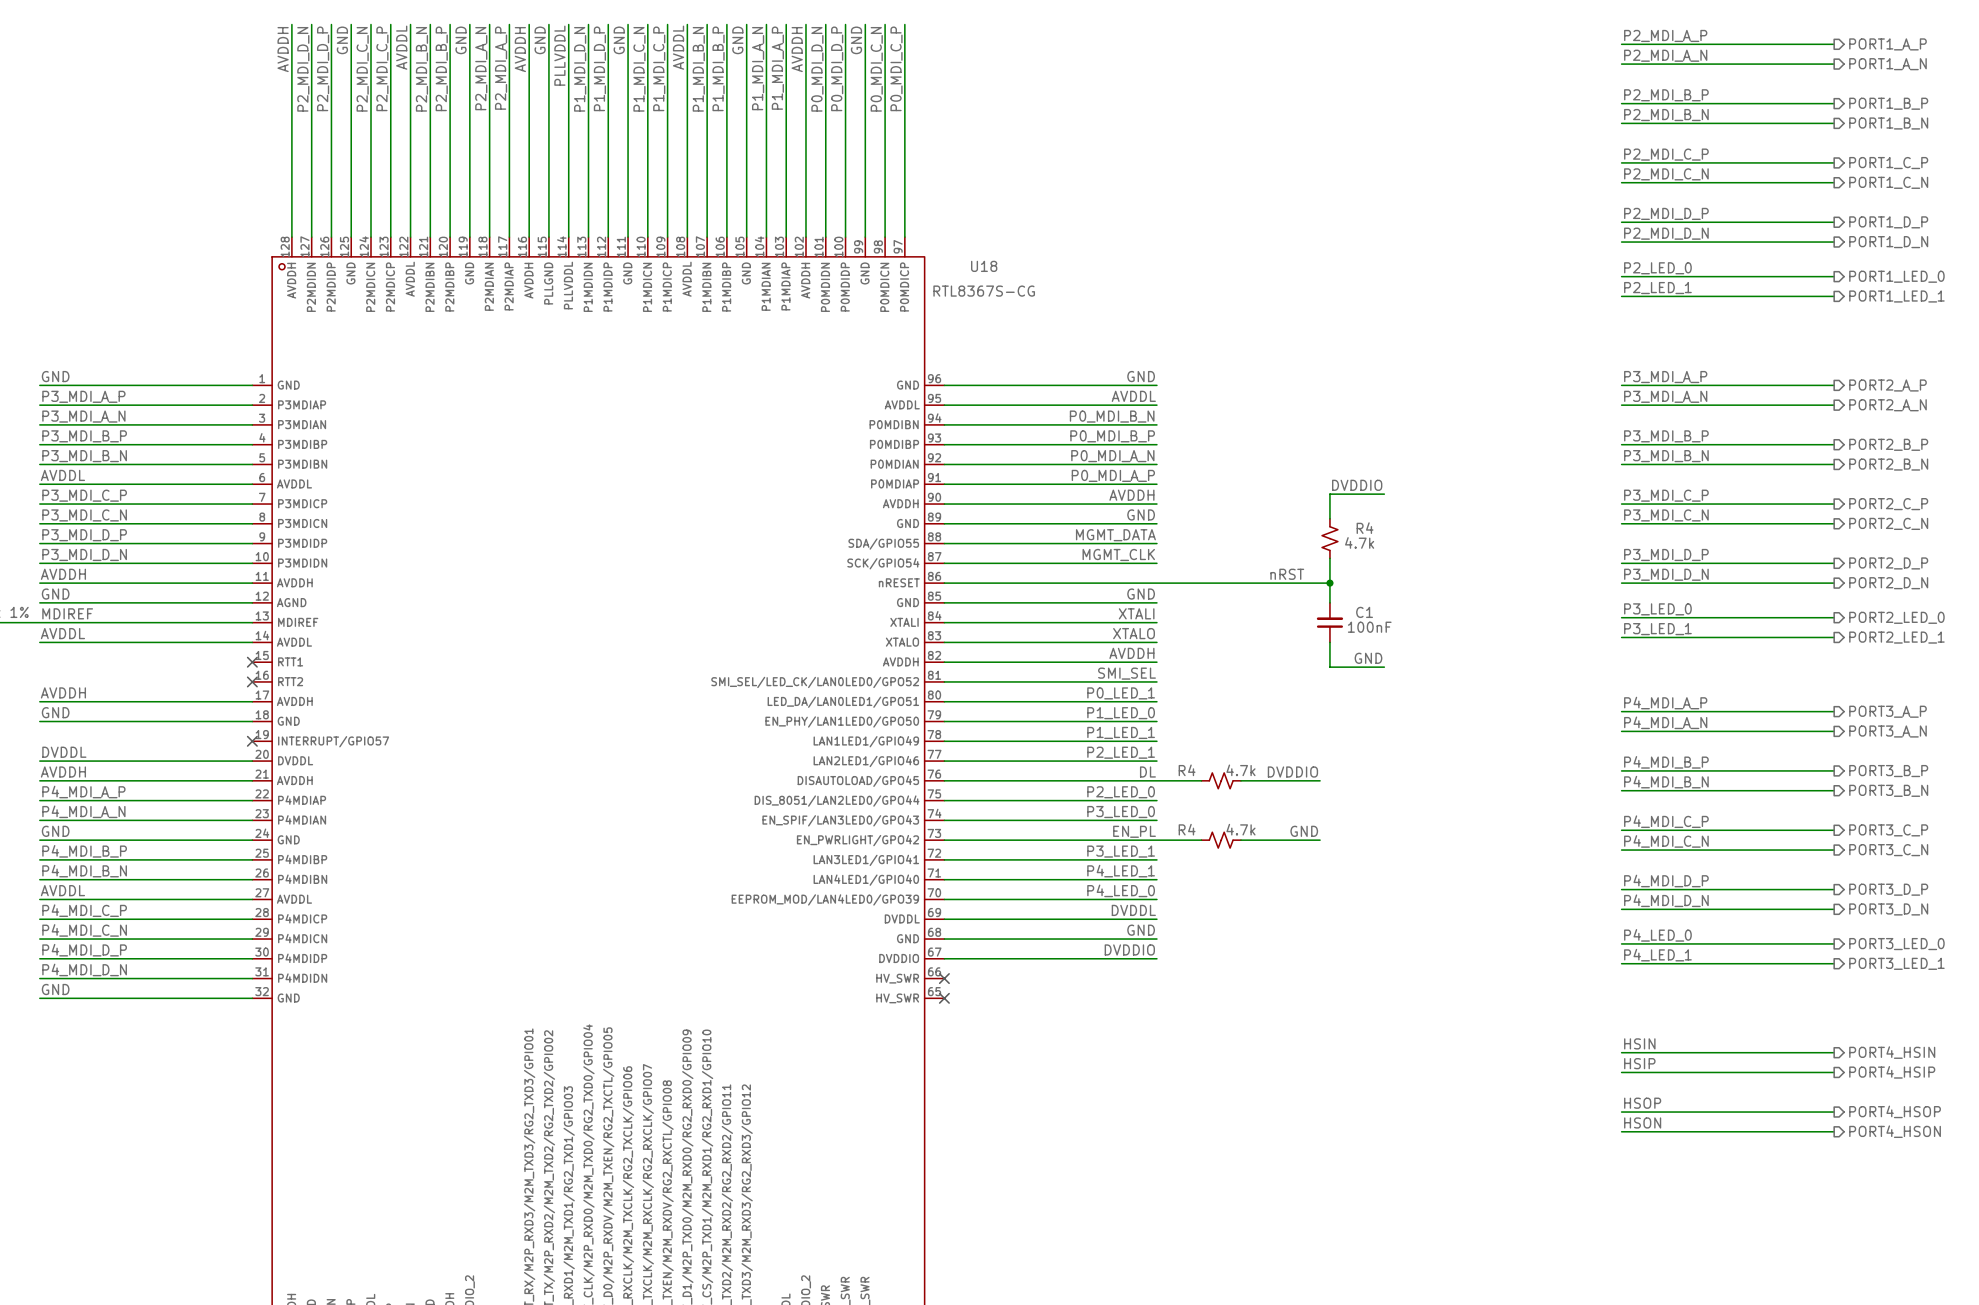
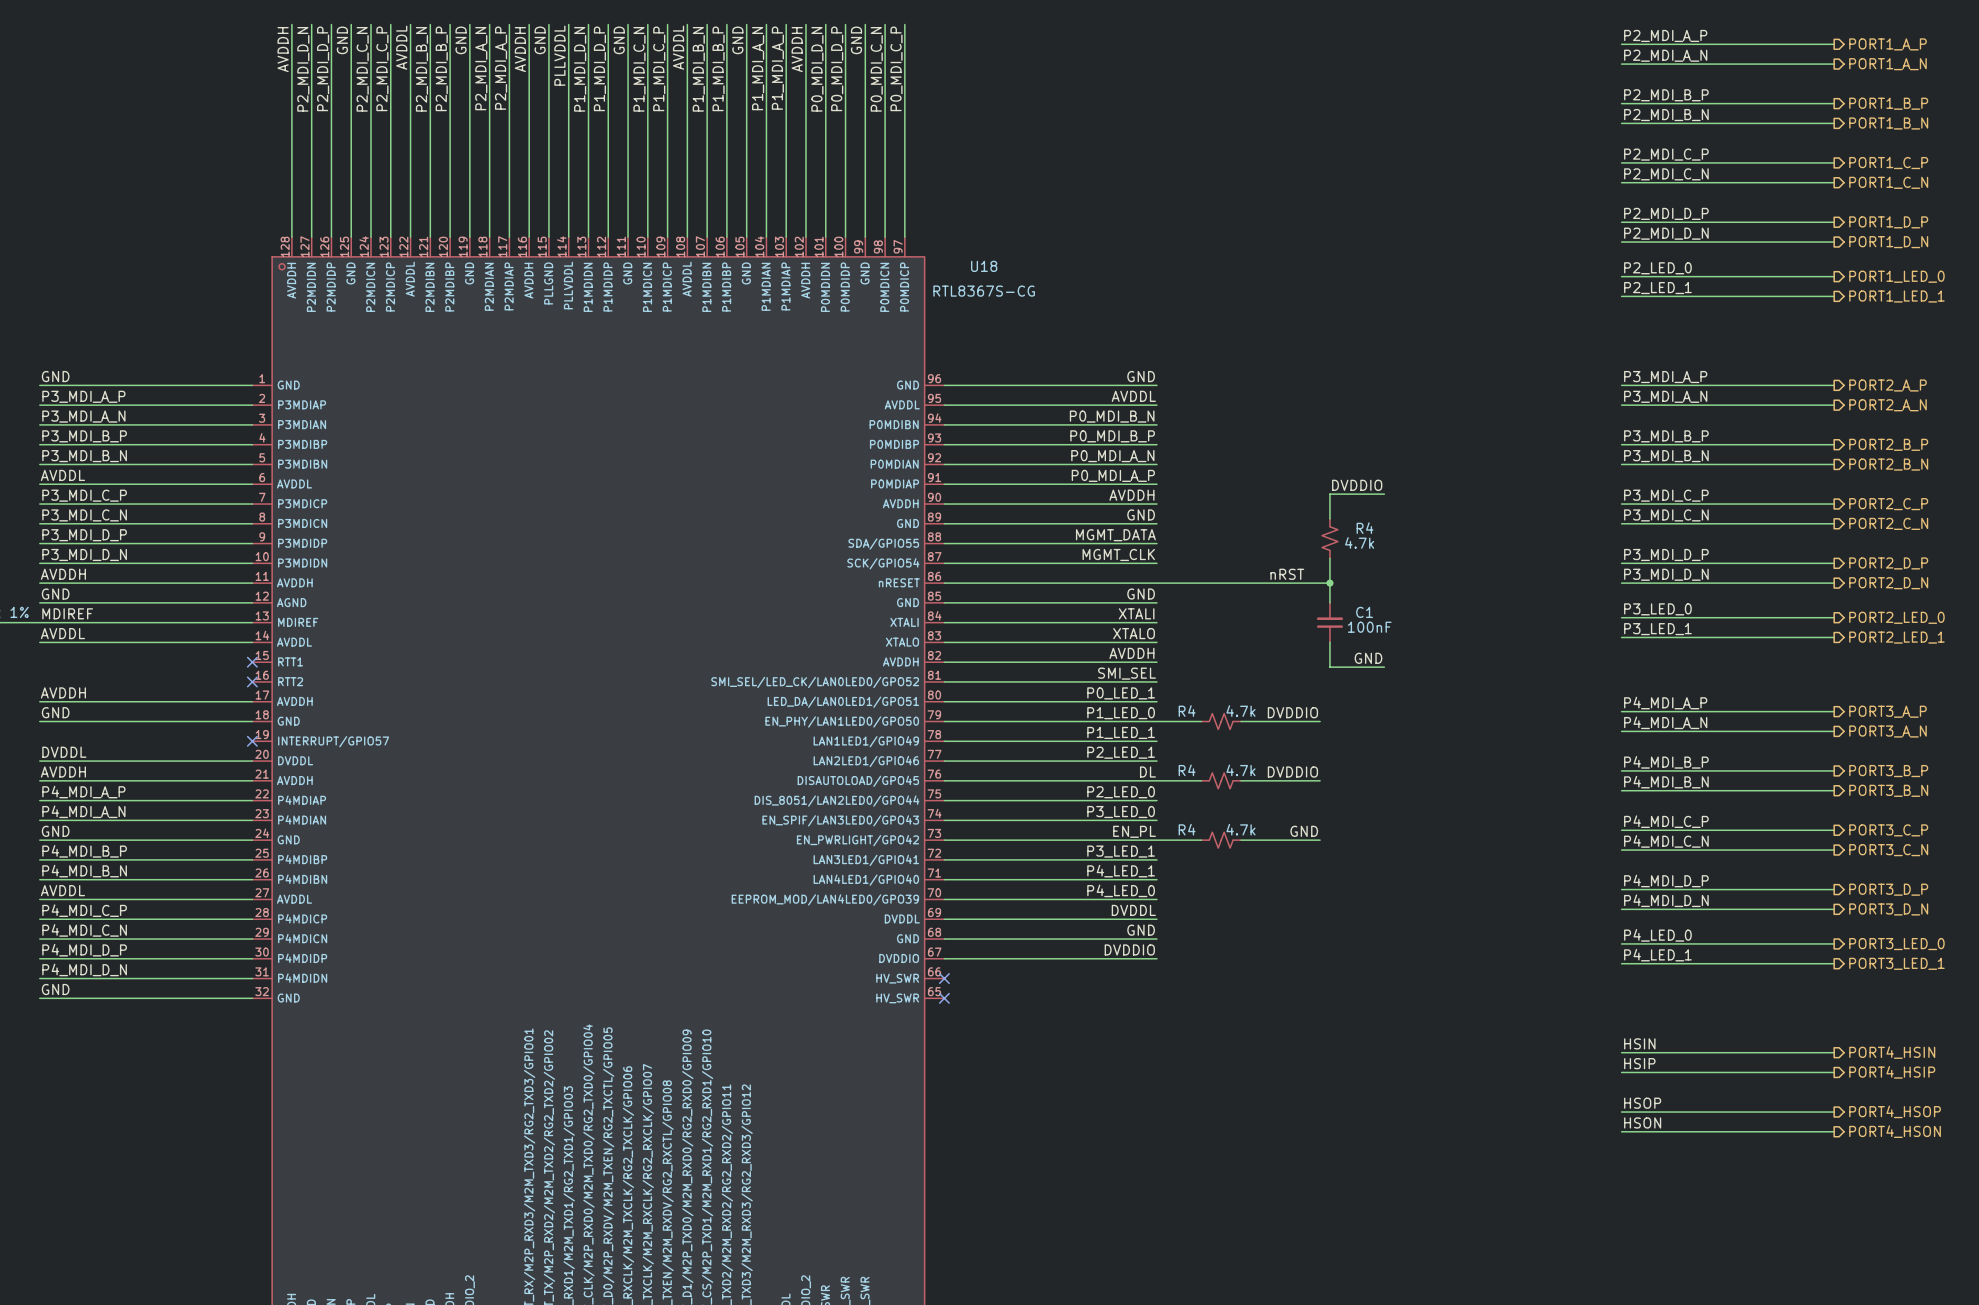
label: none -> DVDDIO (1292, 712)
wire: none -> (1156, 721) (1201, 721)
R4: none -> 4.7k (1221, 721)
wire: none -> (1240, 721) (1320, 721)

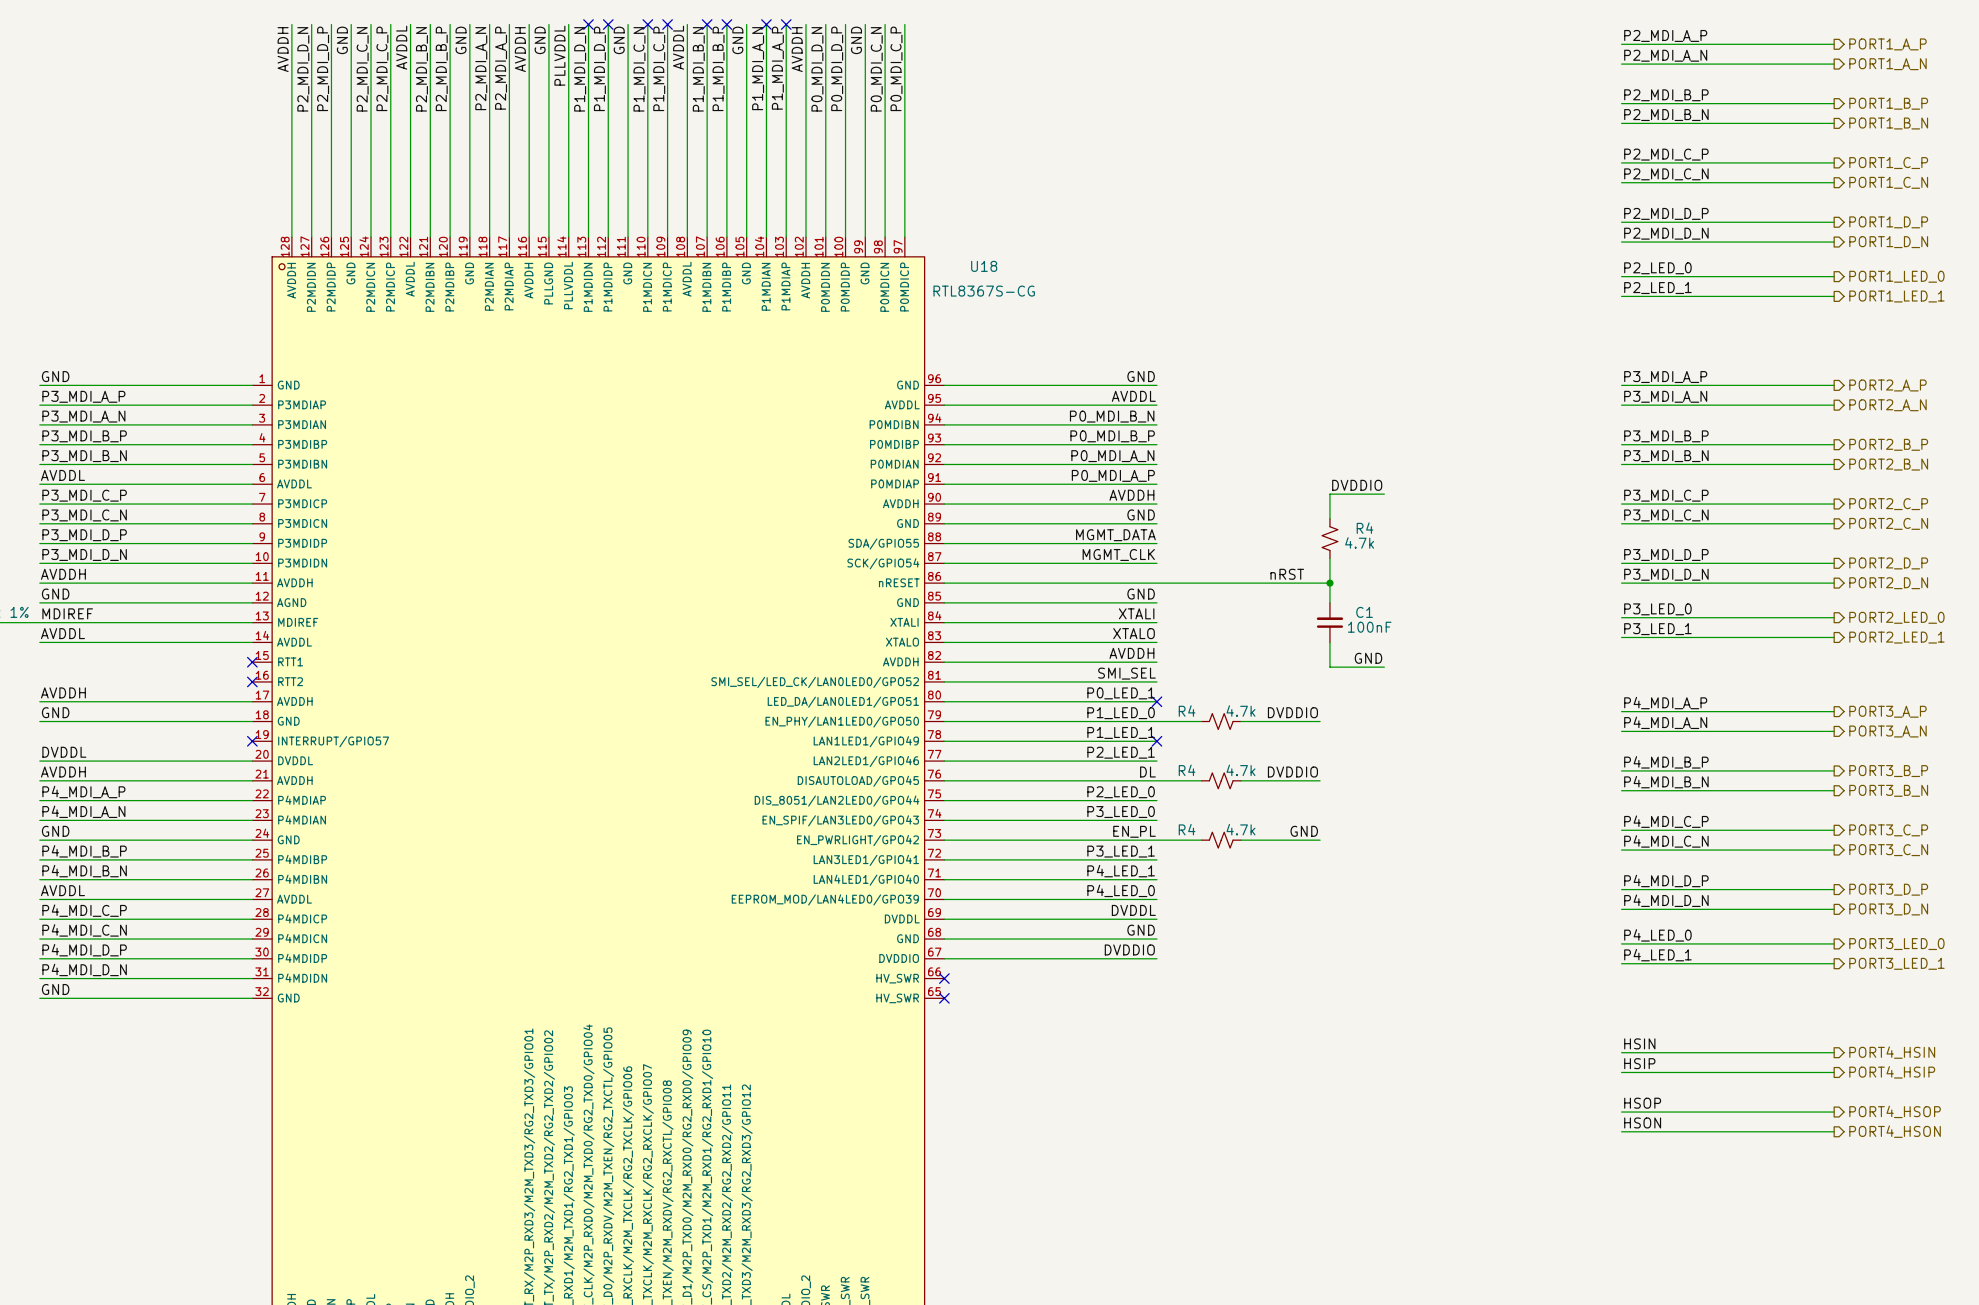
no-connect mark: none -> (588, 24)
no-connect mark: none -> (608, 24)
no-connect mark: none -> (647, 24)
no-connect mark: none -> (667, 24)
no-connect mark: none -> (707, 24)
no-connect mark: none -> (726, 24)
no-connect mark: none -> (766, 24)
no-connect mark: none -> (786, 24)
no-connect mark: none -> (1156, 701)
no-connect mark: none -> (1156, 741)

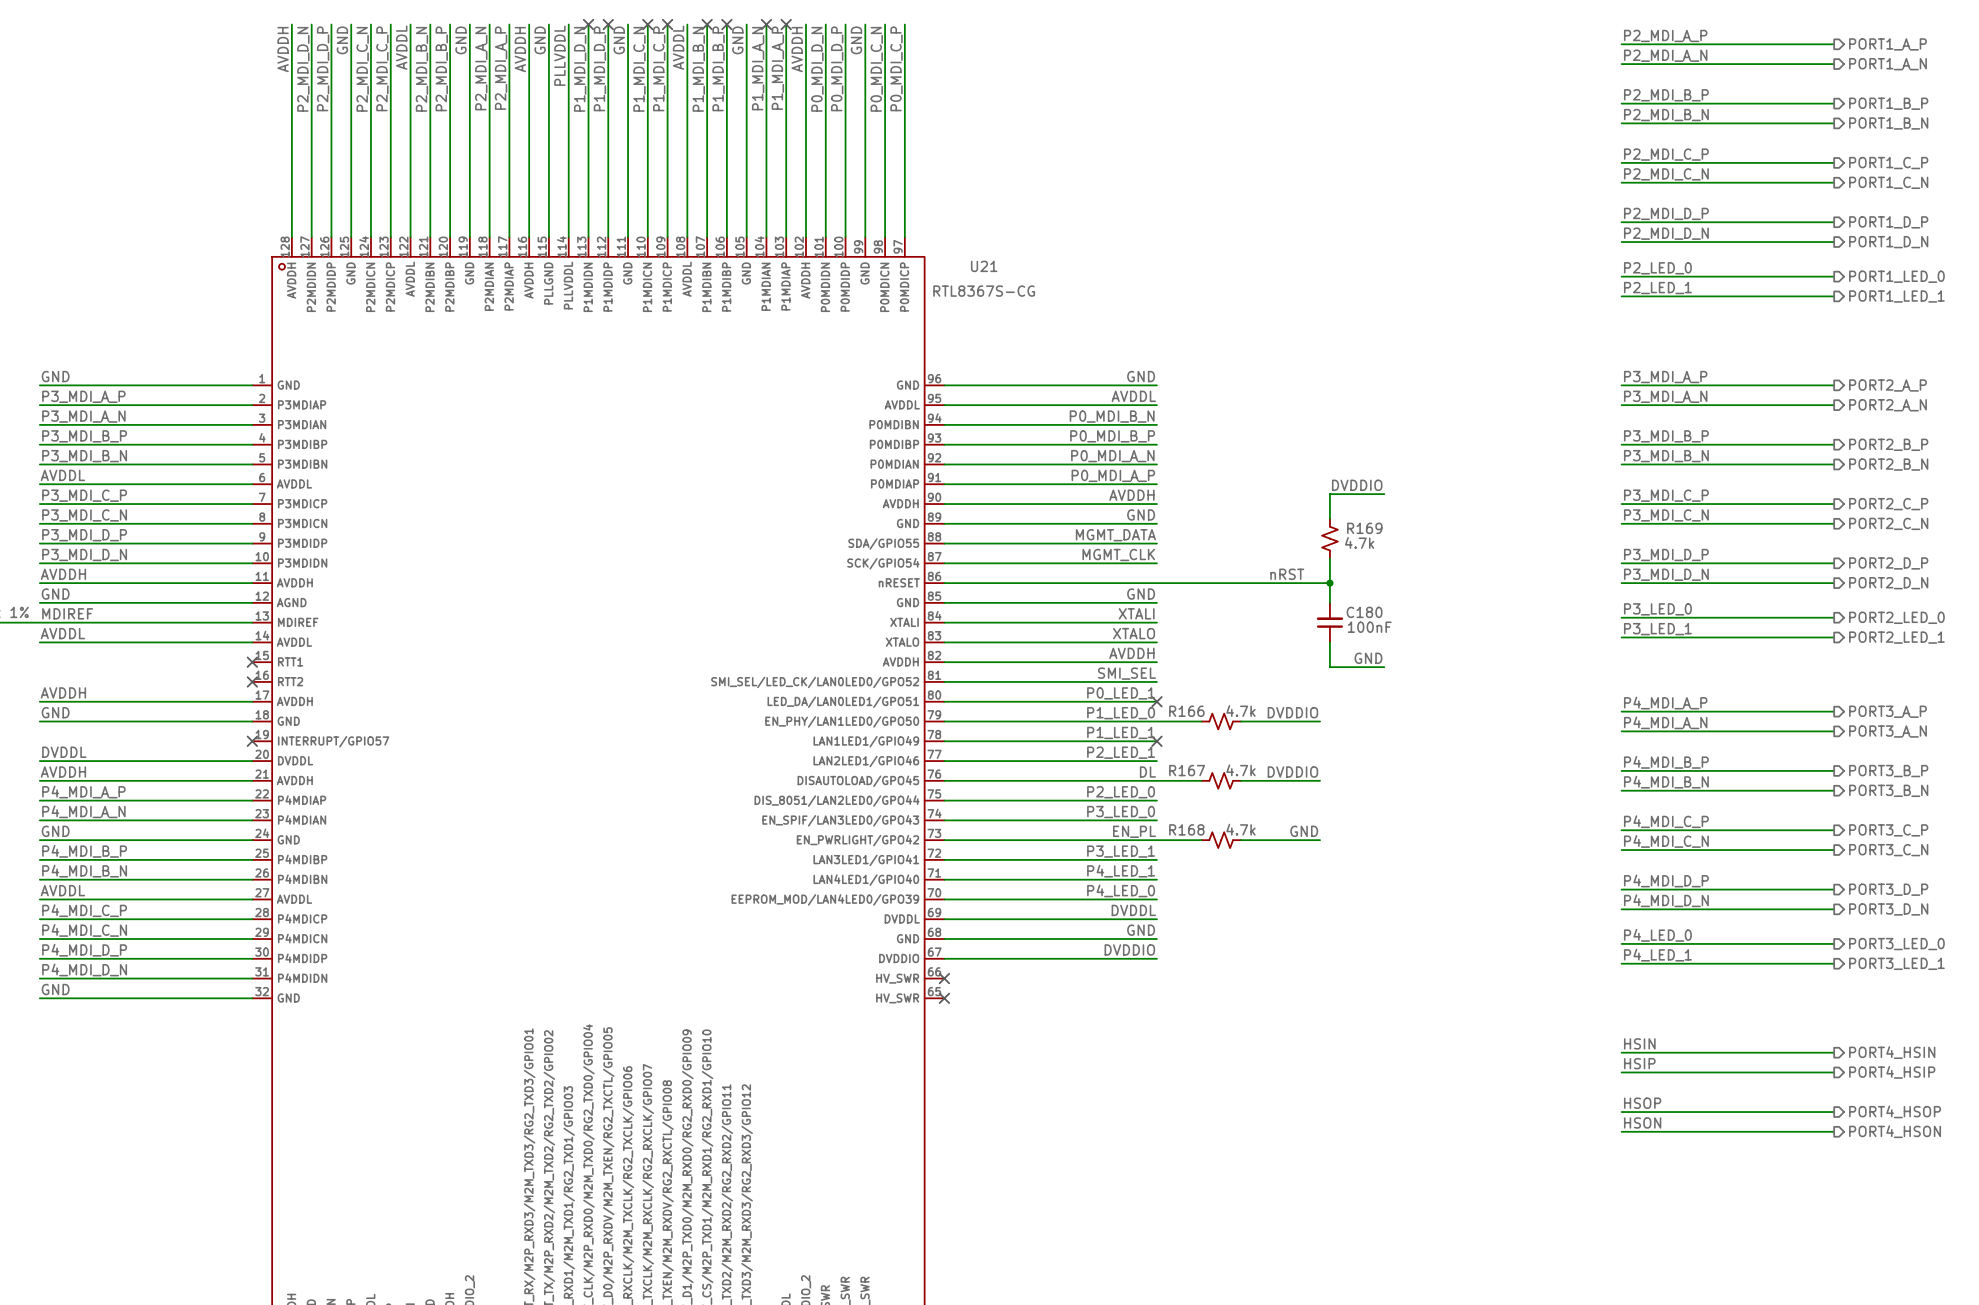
U18 name: U18 (984, 266) -> U21 (984, 266)
R4 name: R4 (1365, 528) -> R169 (1364, 528)
C1 name: C1 (1364, 612) -> C180 (1364, 612)
R4 name: R4 (1187, 711) -> R166 (1186, 711)
R4 name: R4 (1187, 770) -> R167 (1187, 770)
R4 name: R4 (1187, 829) -> R168 (1186, 829)

